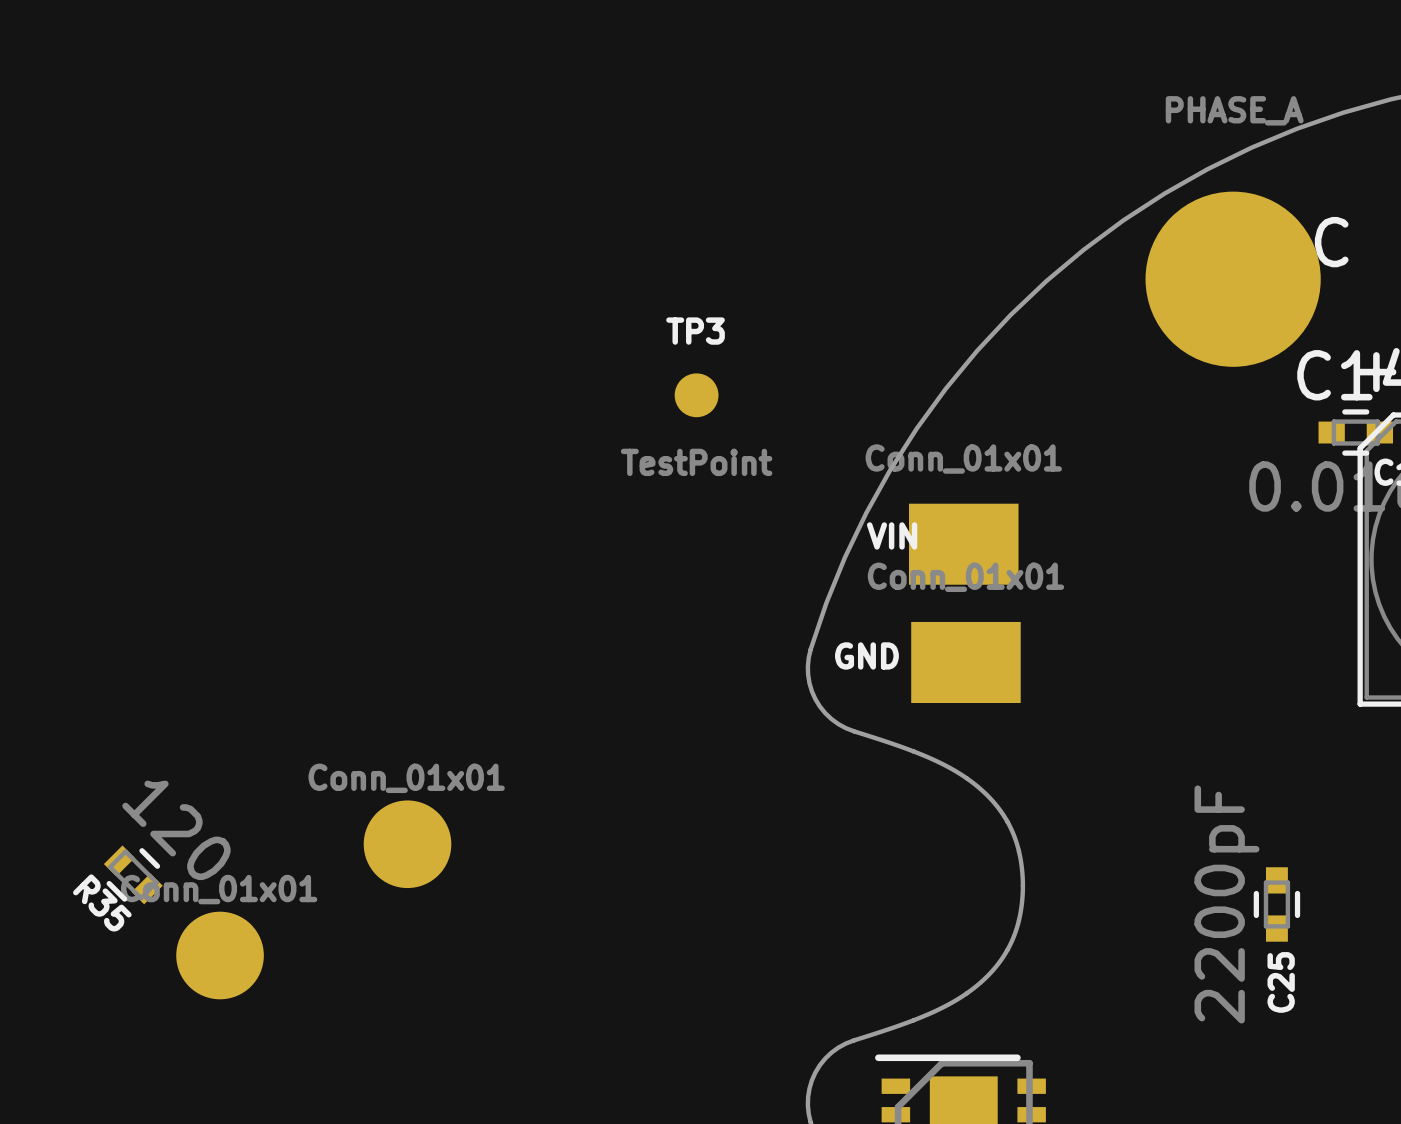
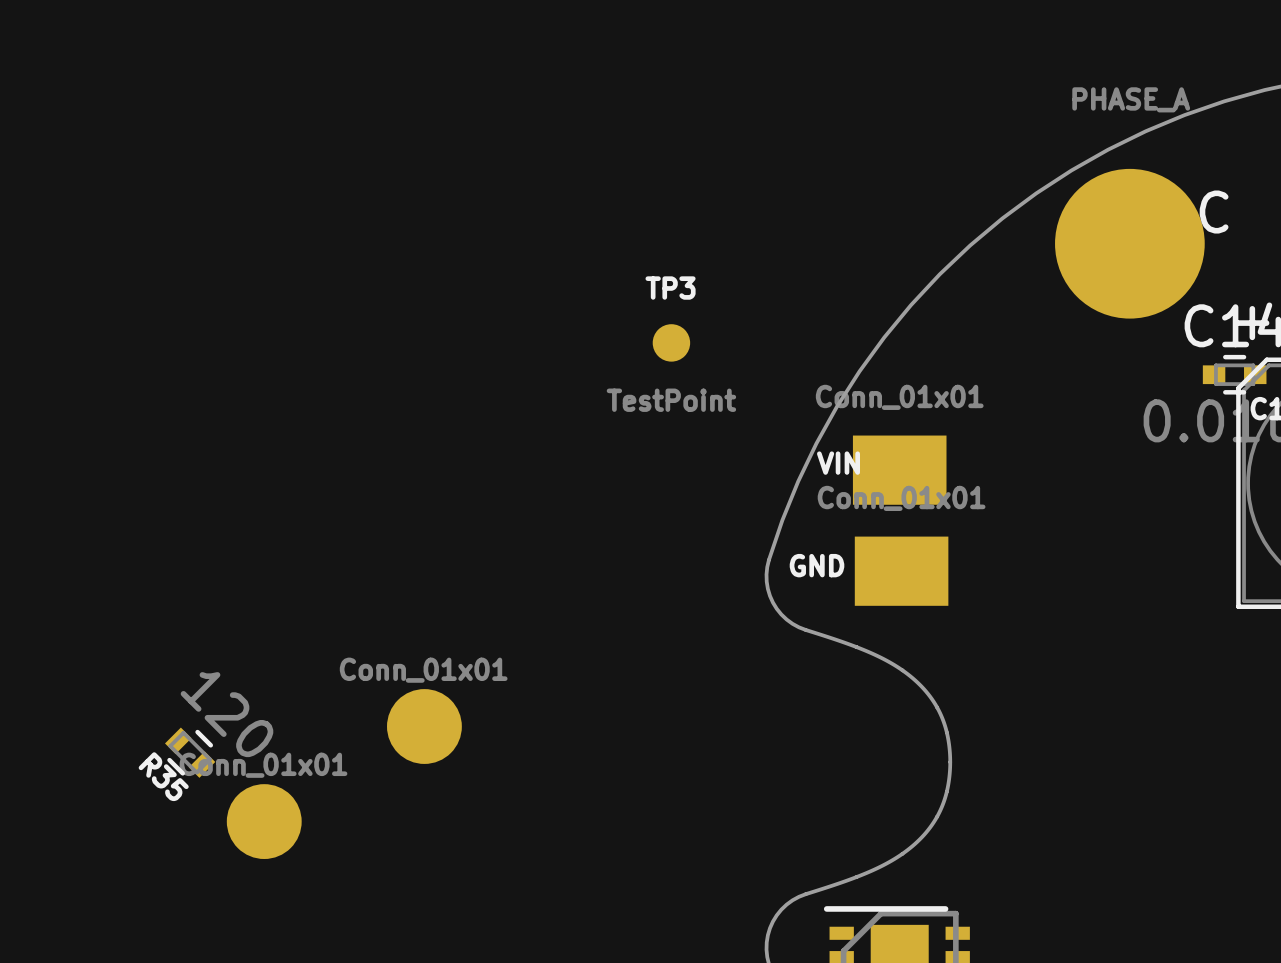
C25: 2200pF (1276, 904) -> none

